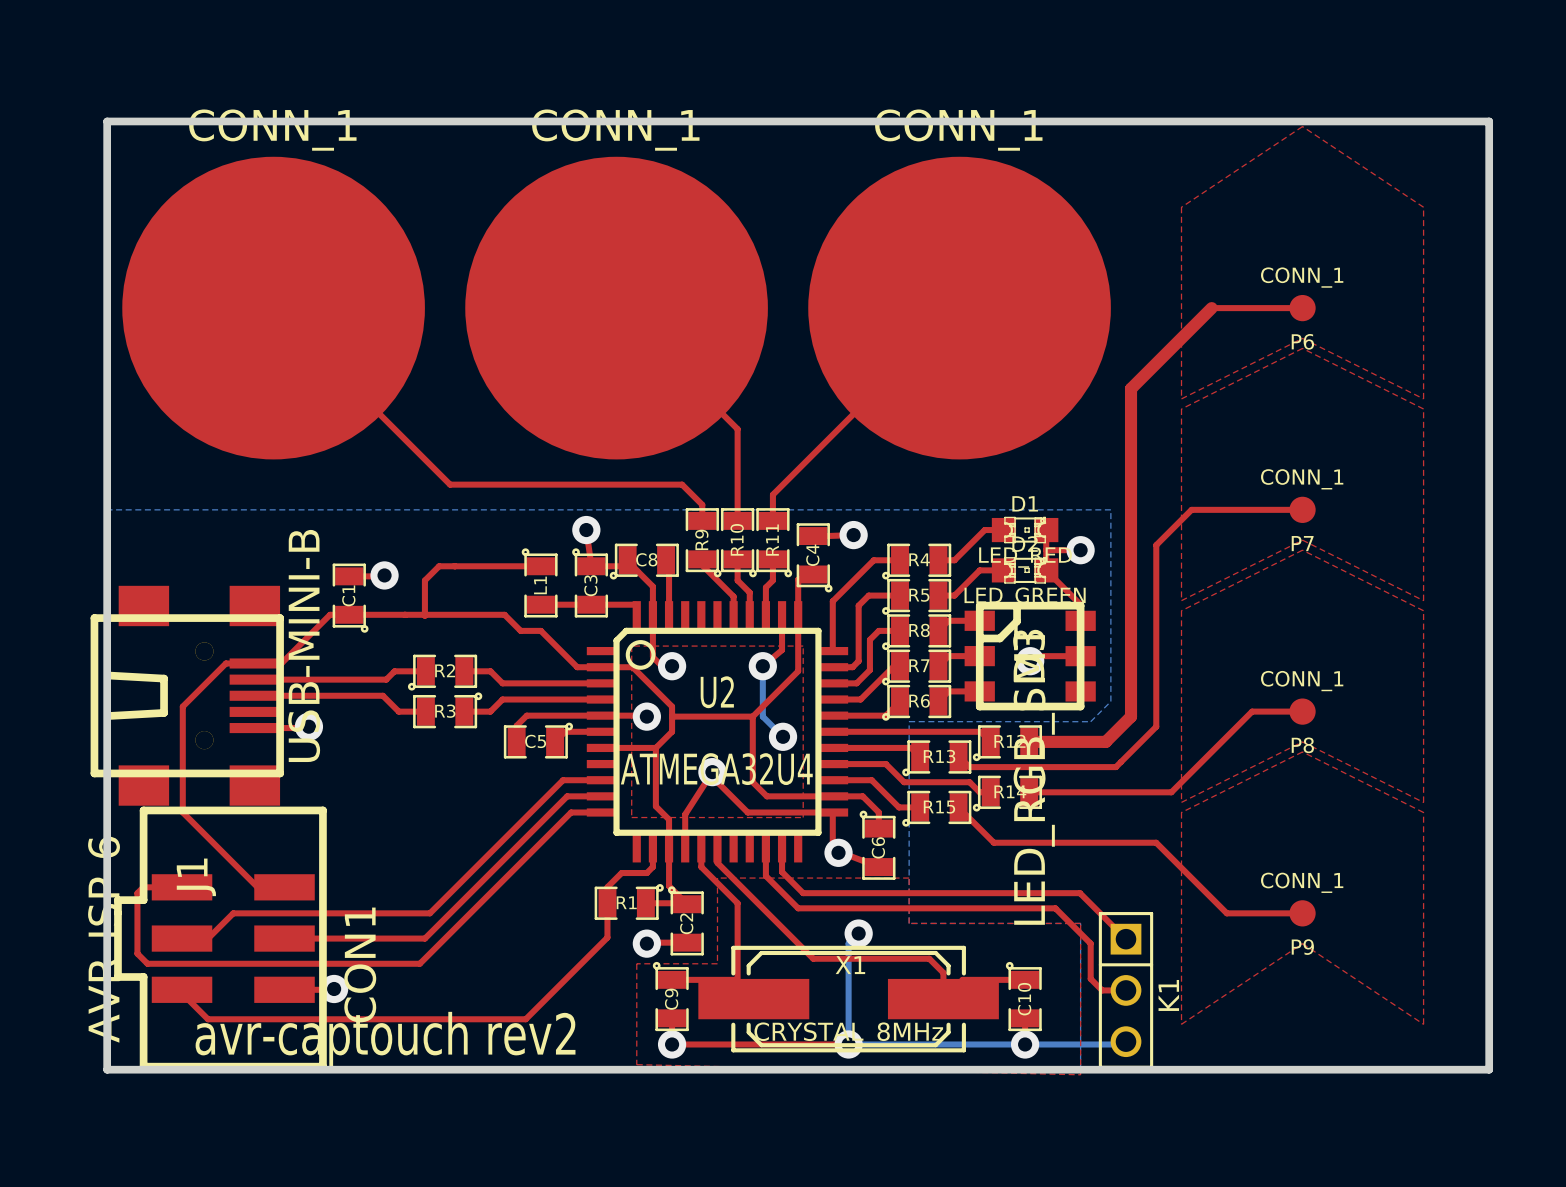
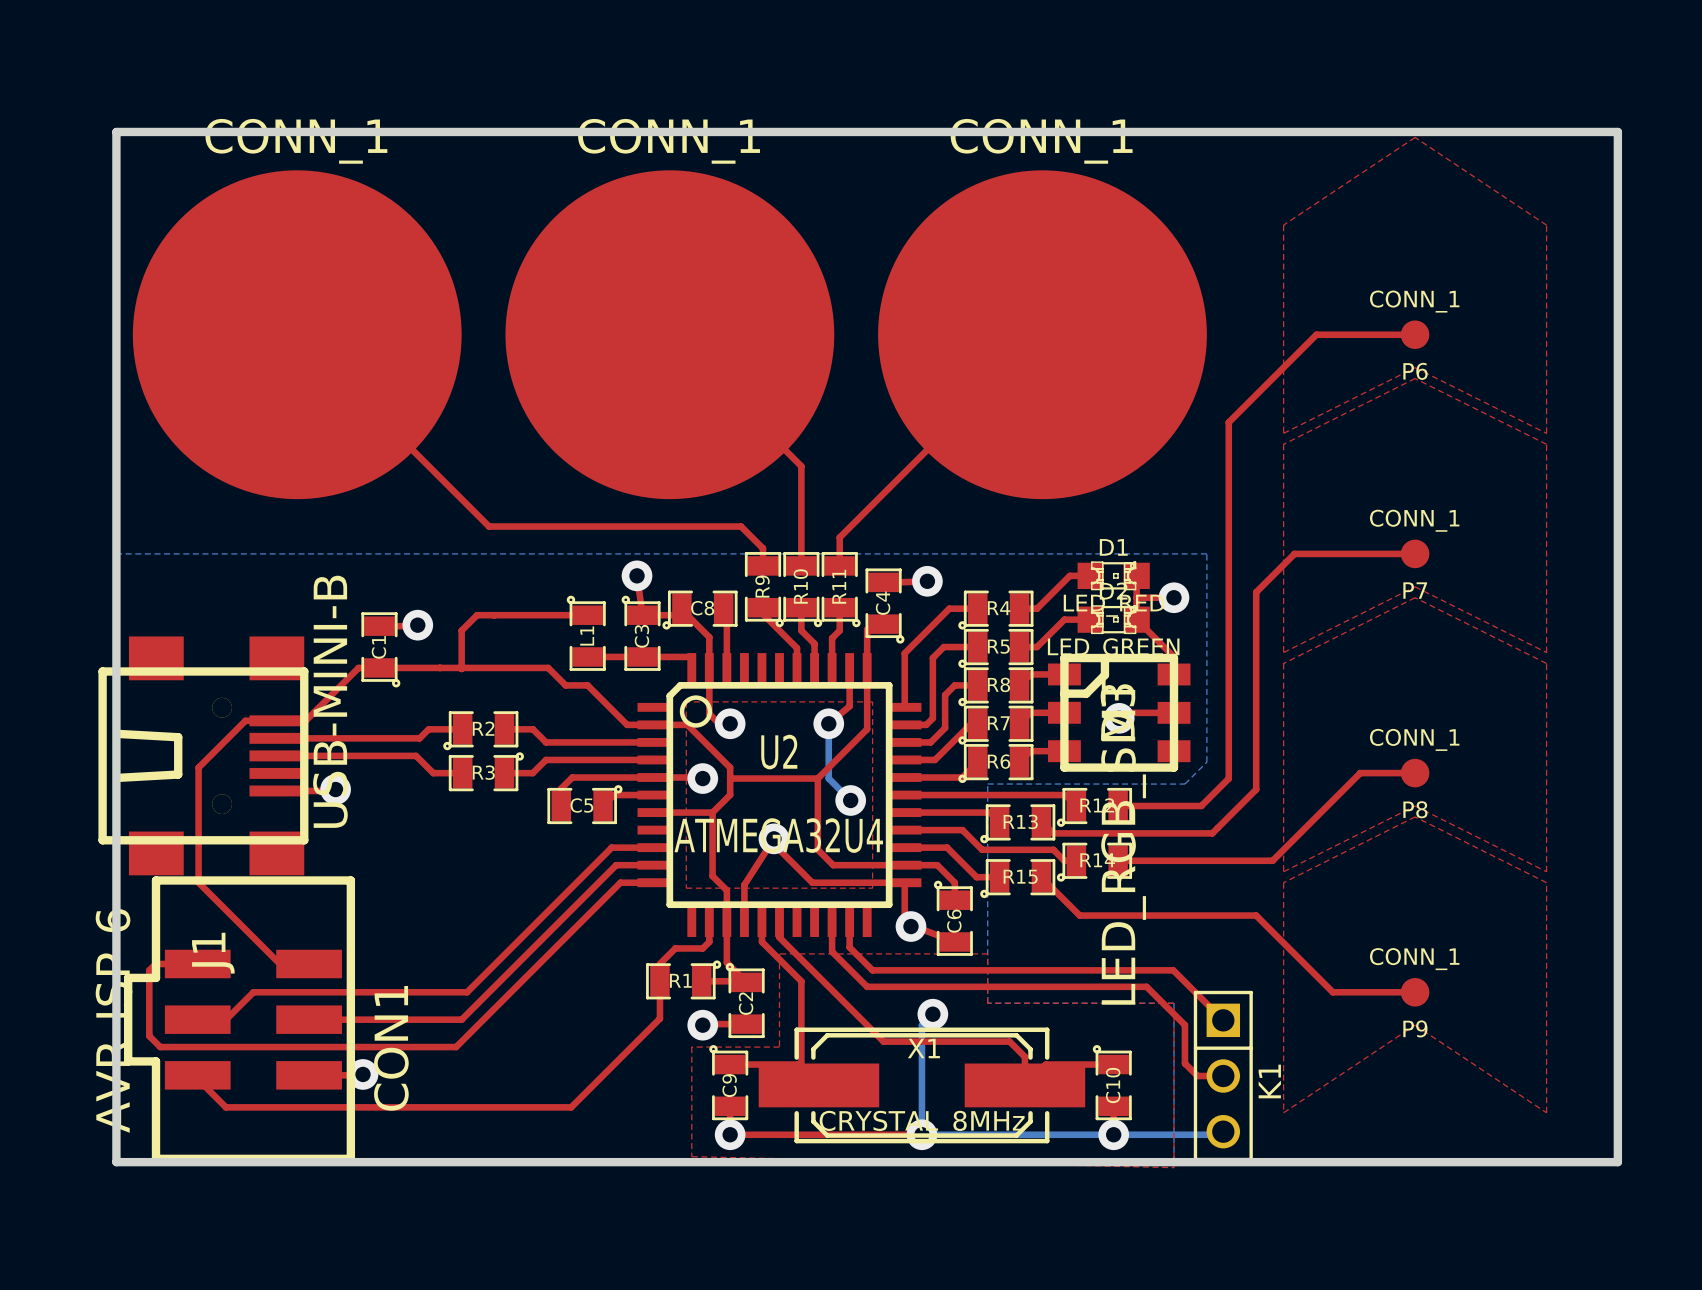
top track width: thick (1211, 308) (1131, 388) (1131, 716) (1105, 741) (1029, 741) -> thin (1316, 334) (1228, 422) (1228, 778) (1201, 806) (1118, 806)
text: avr-captouch rev2 (385, 1039) -> none

